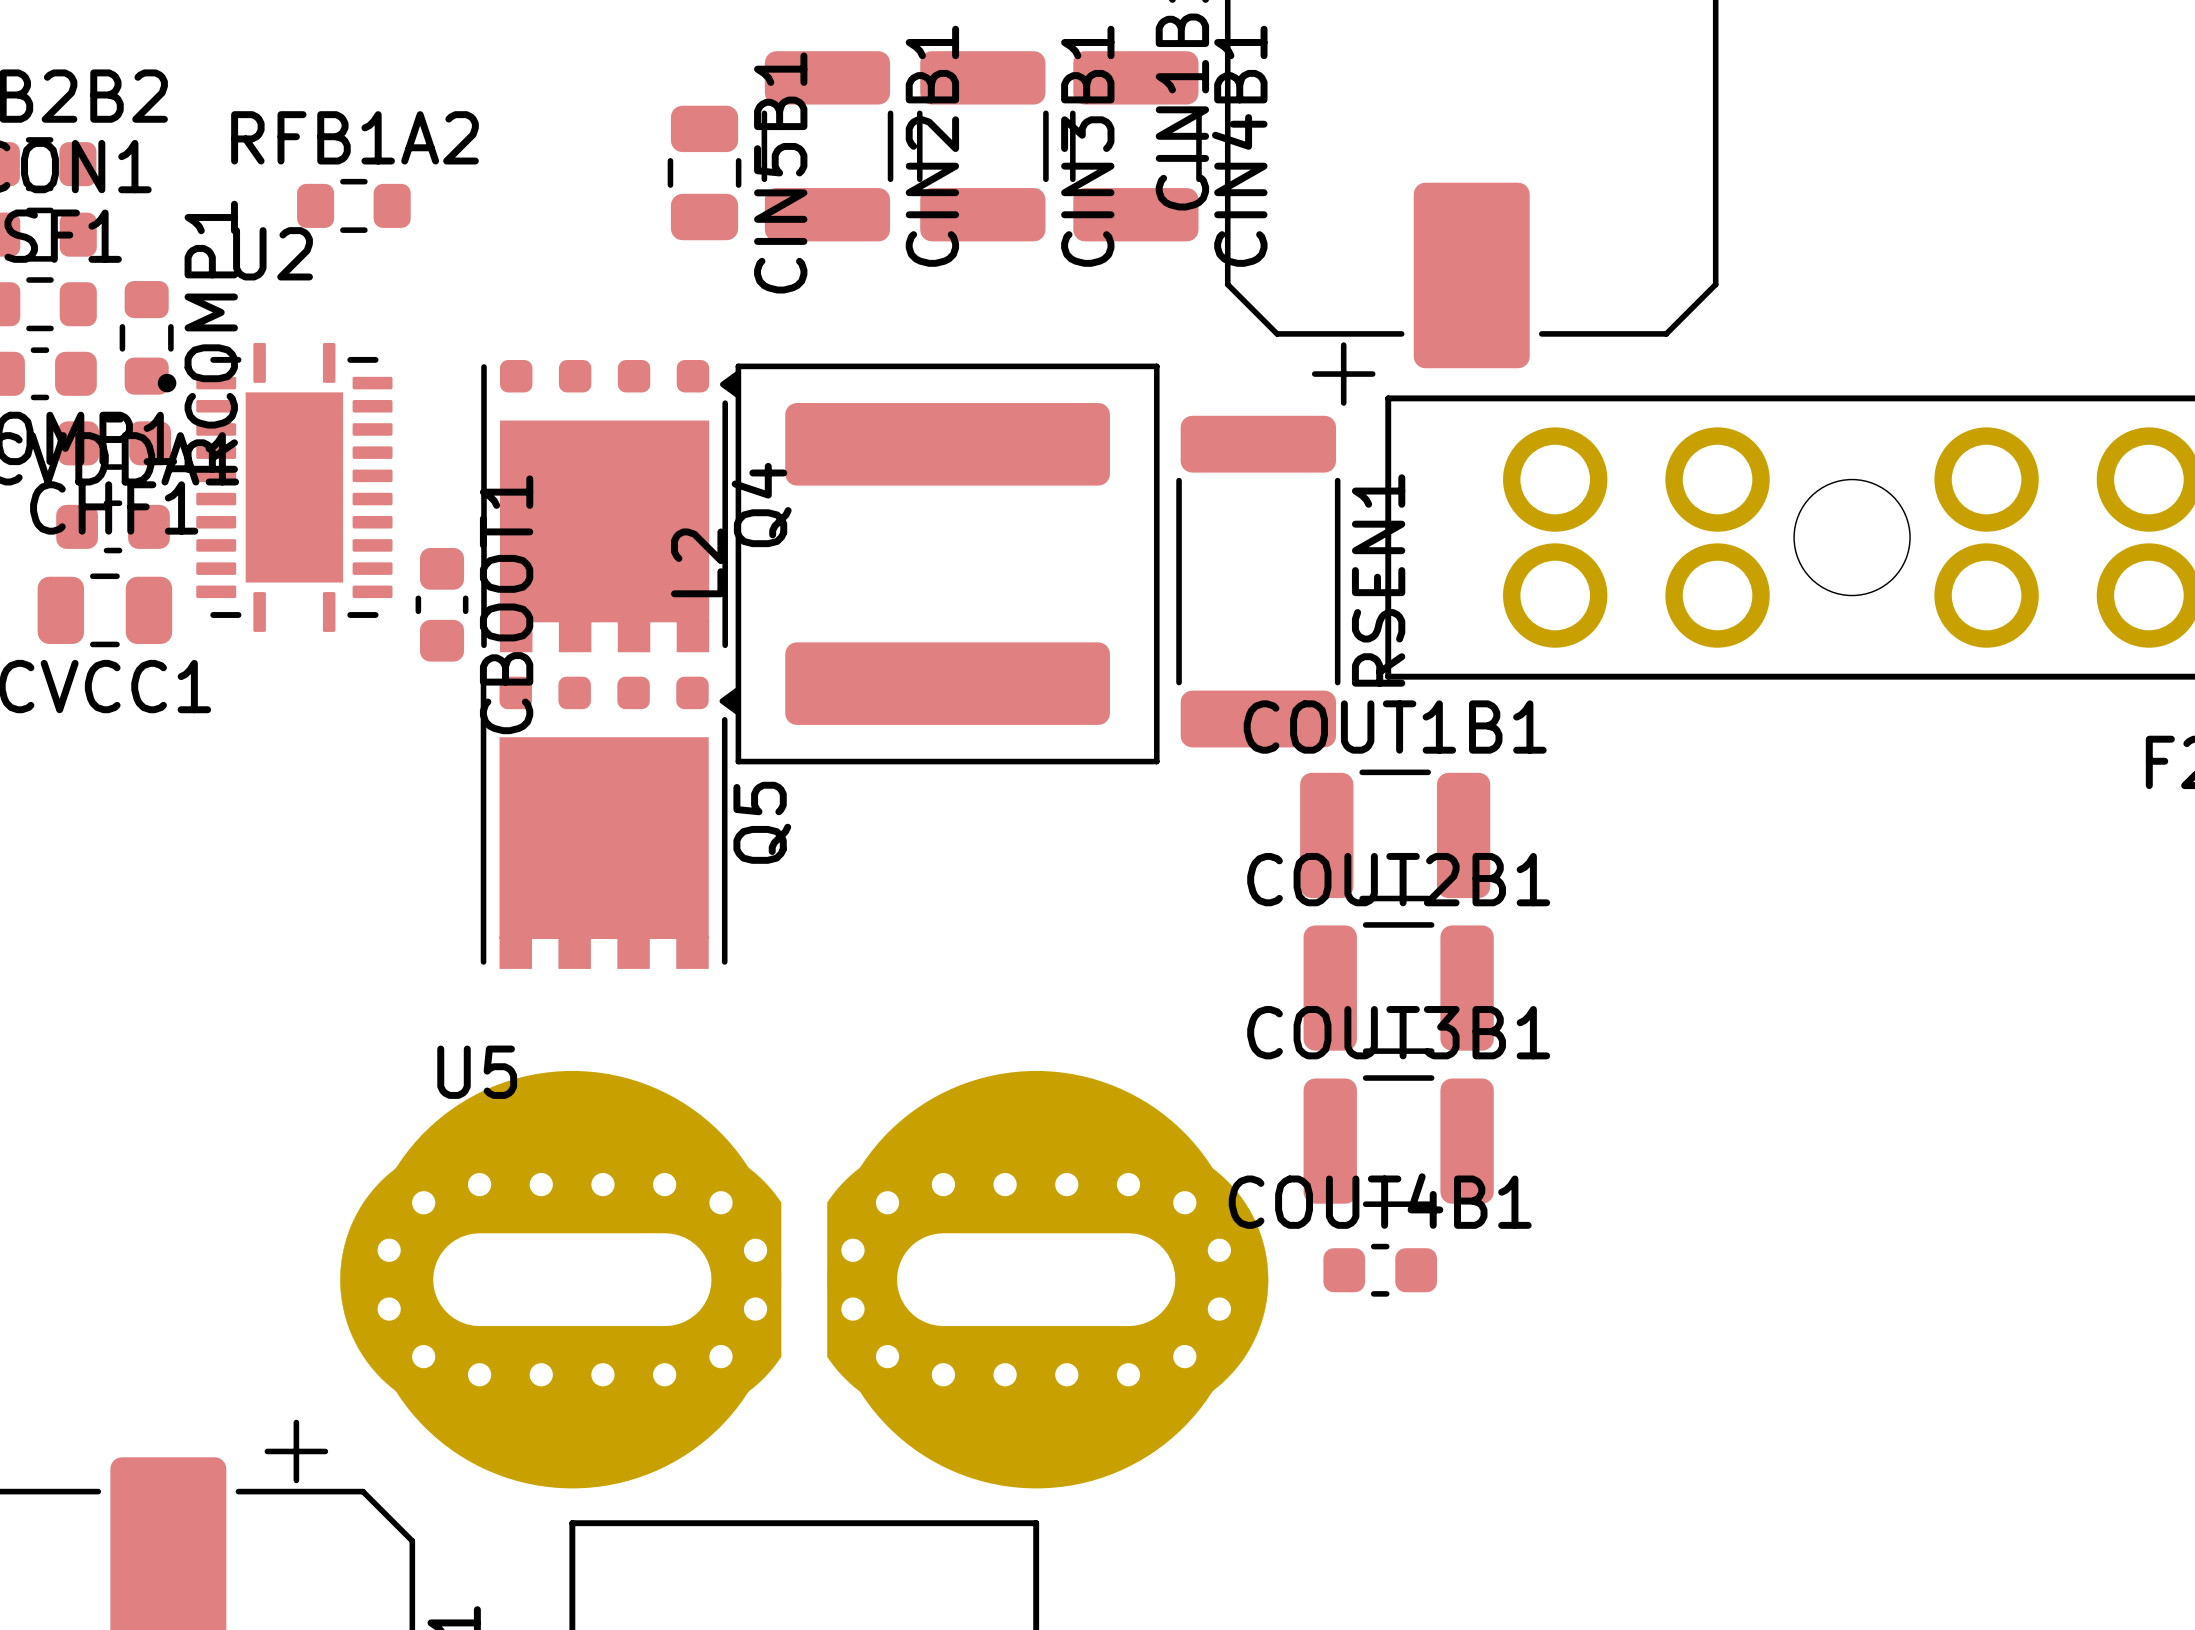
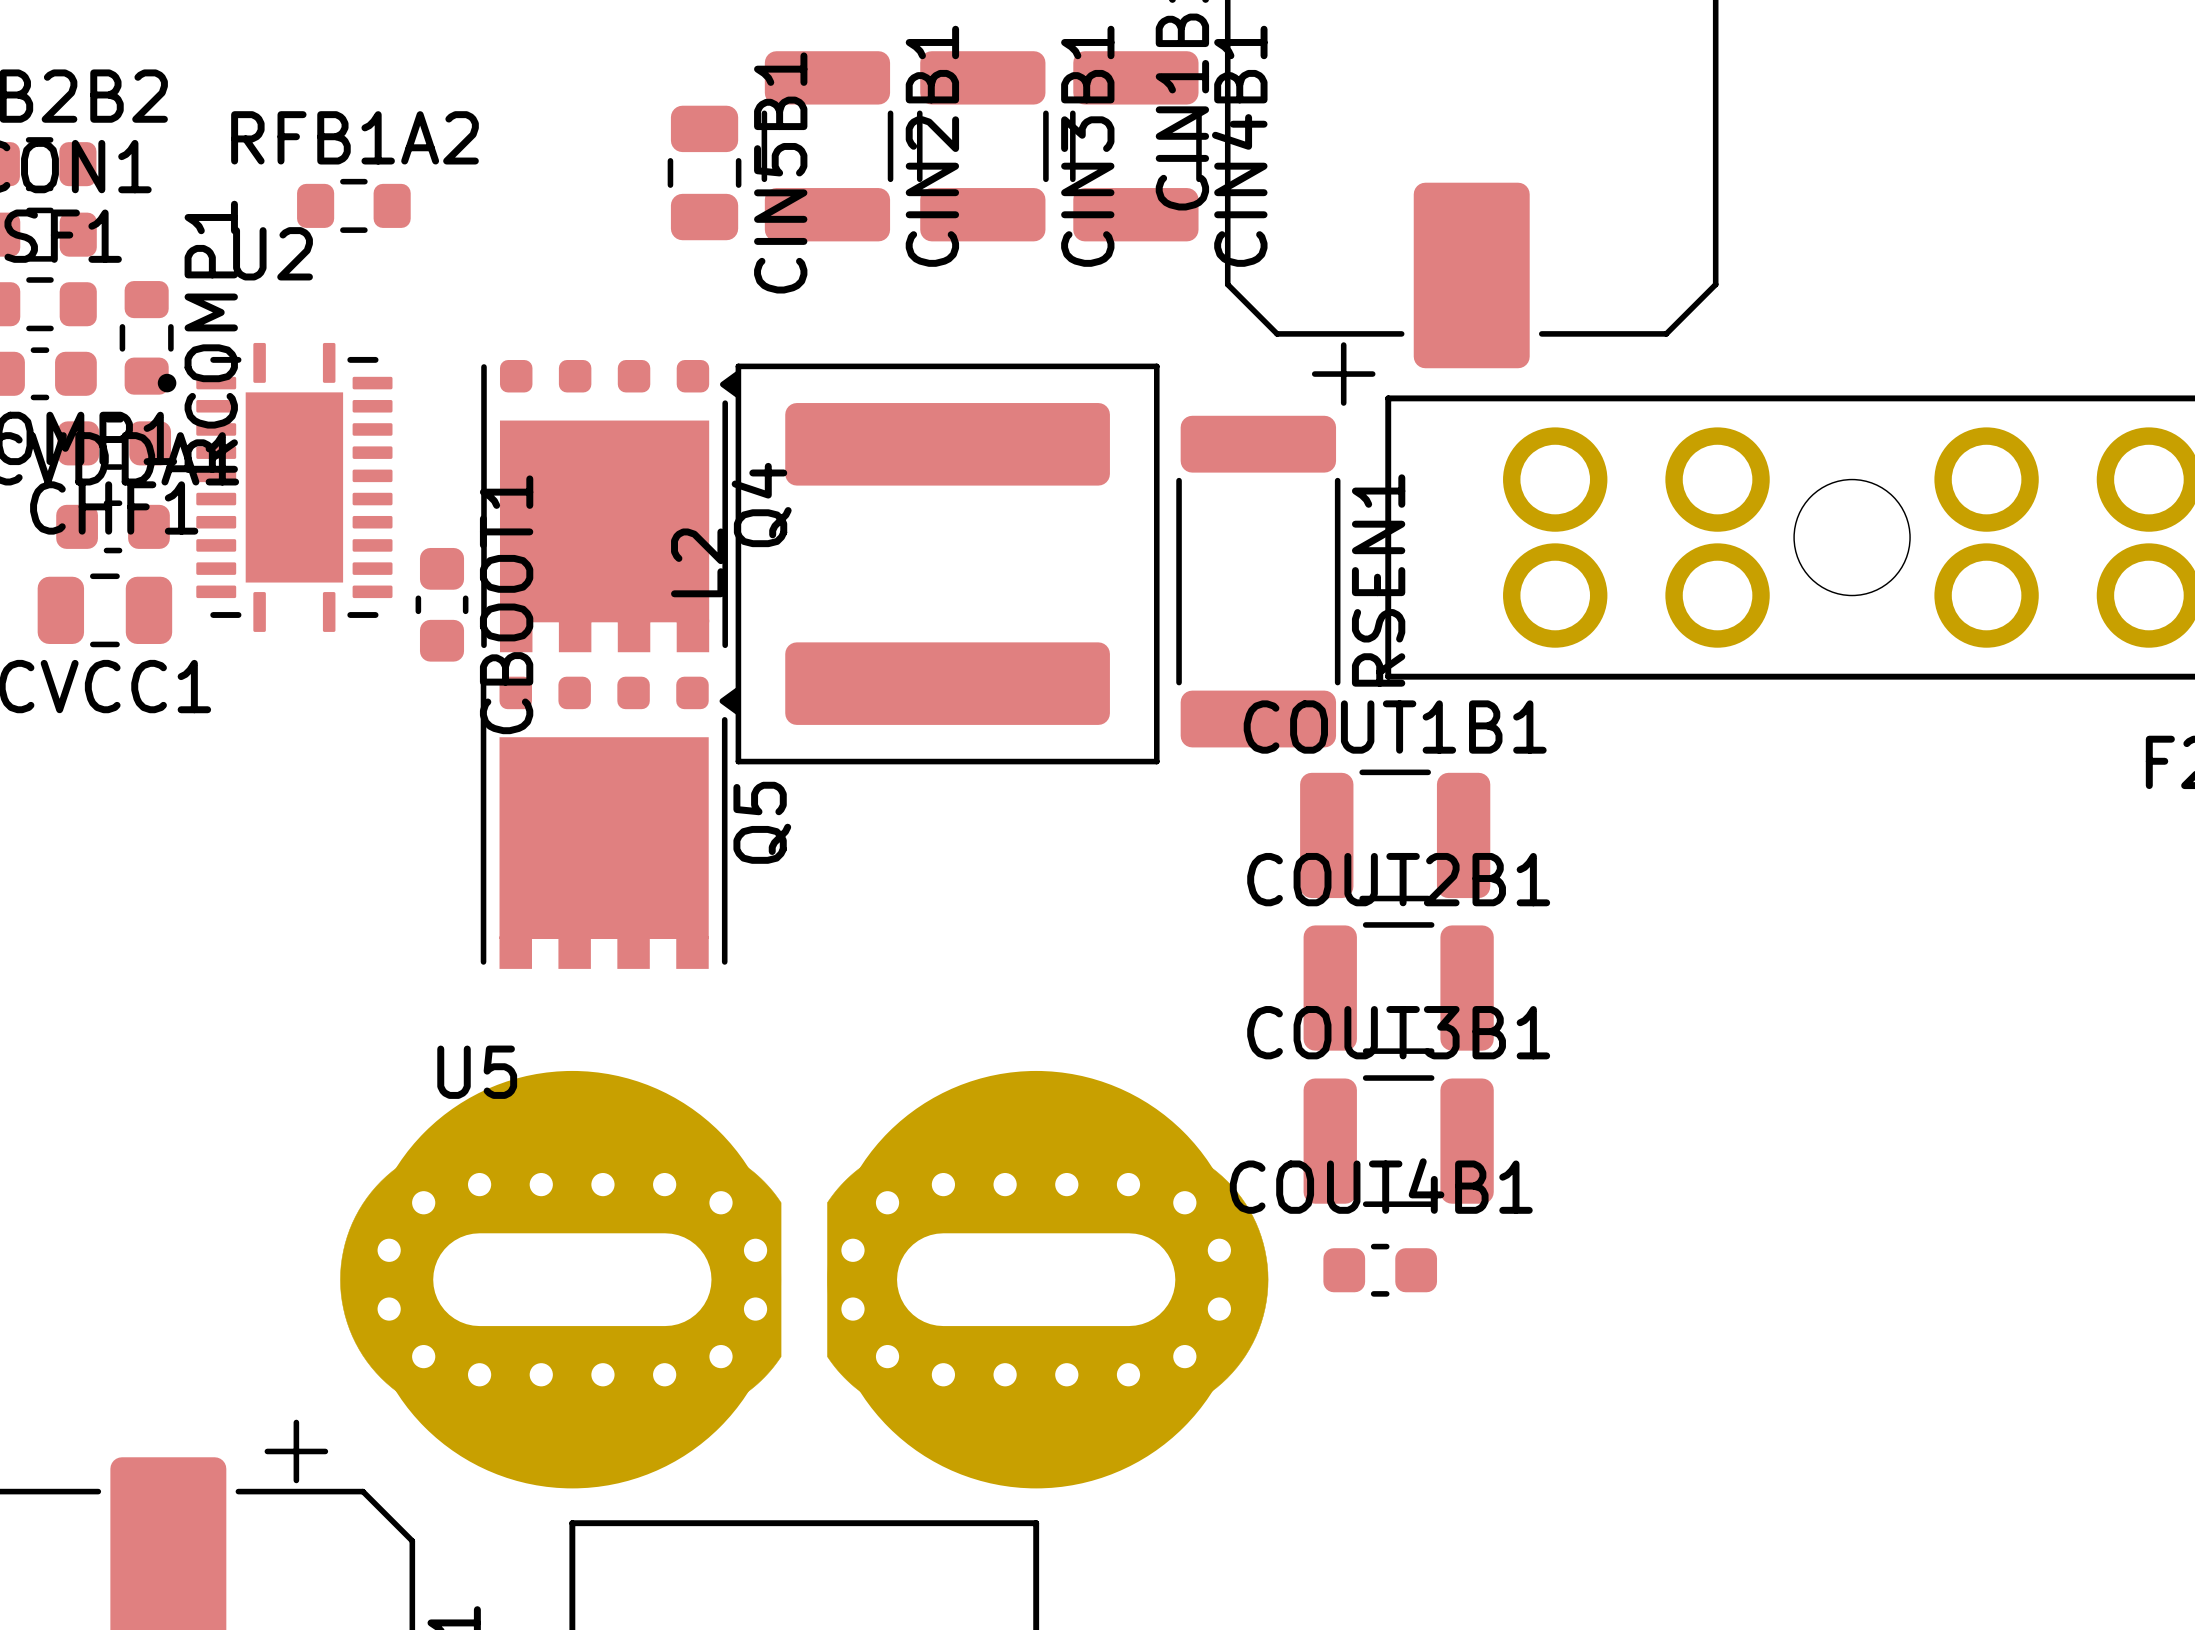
COUT4B1 name position: COUT4B1 (1380, 1201) -> COUT4B1 (1381, 1186)

